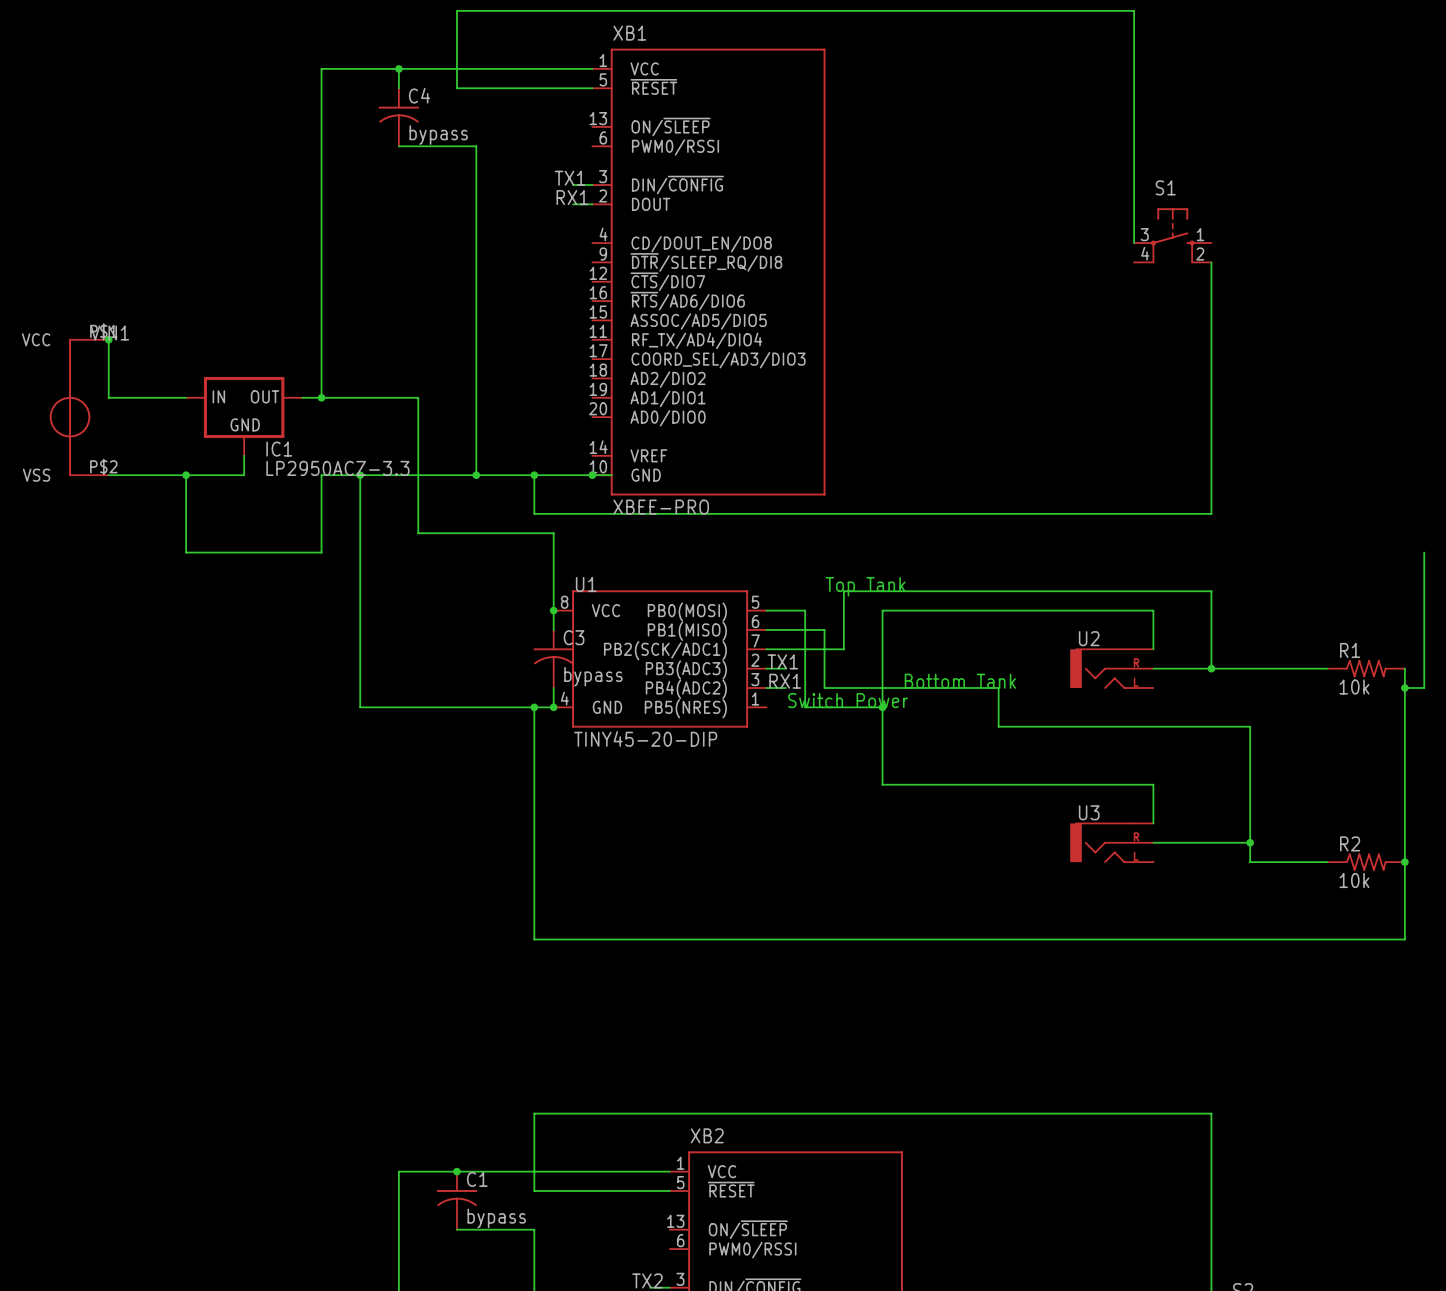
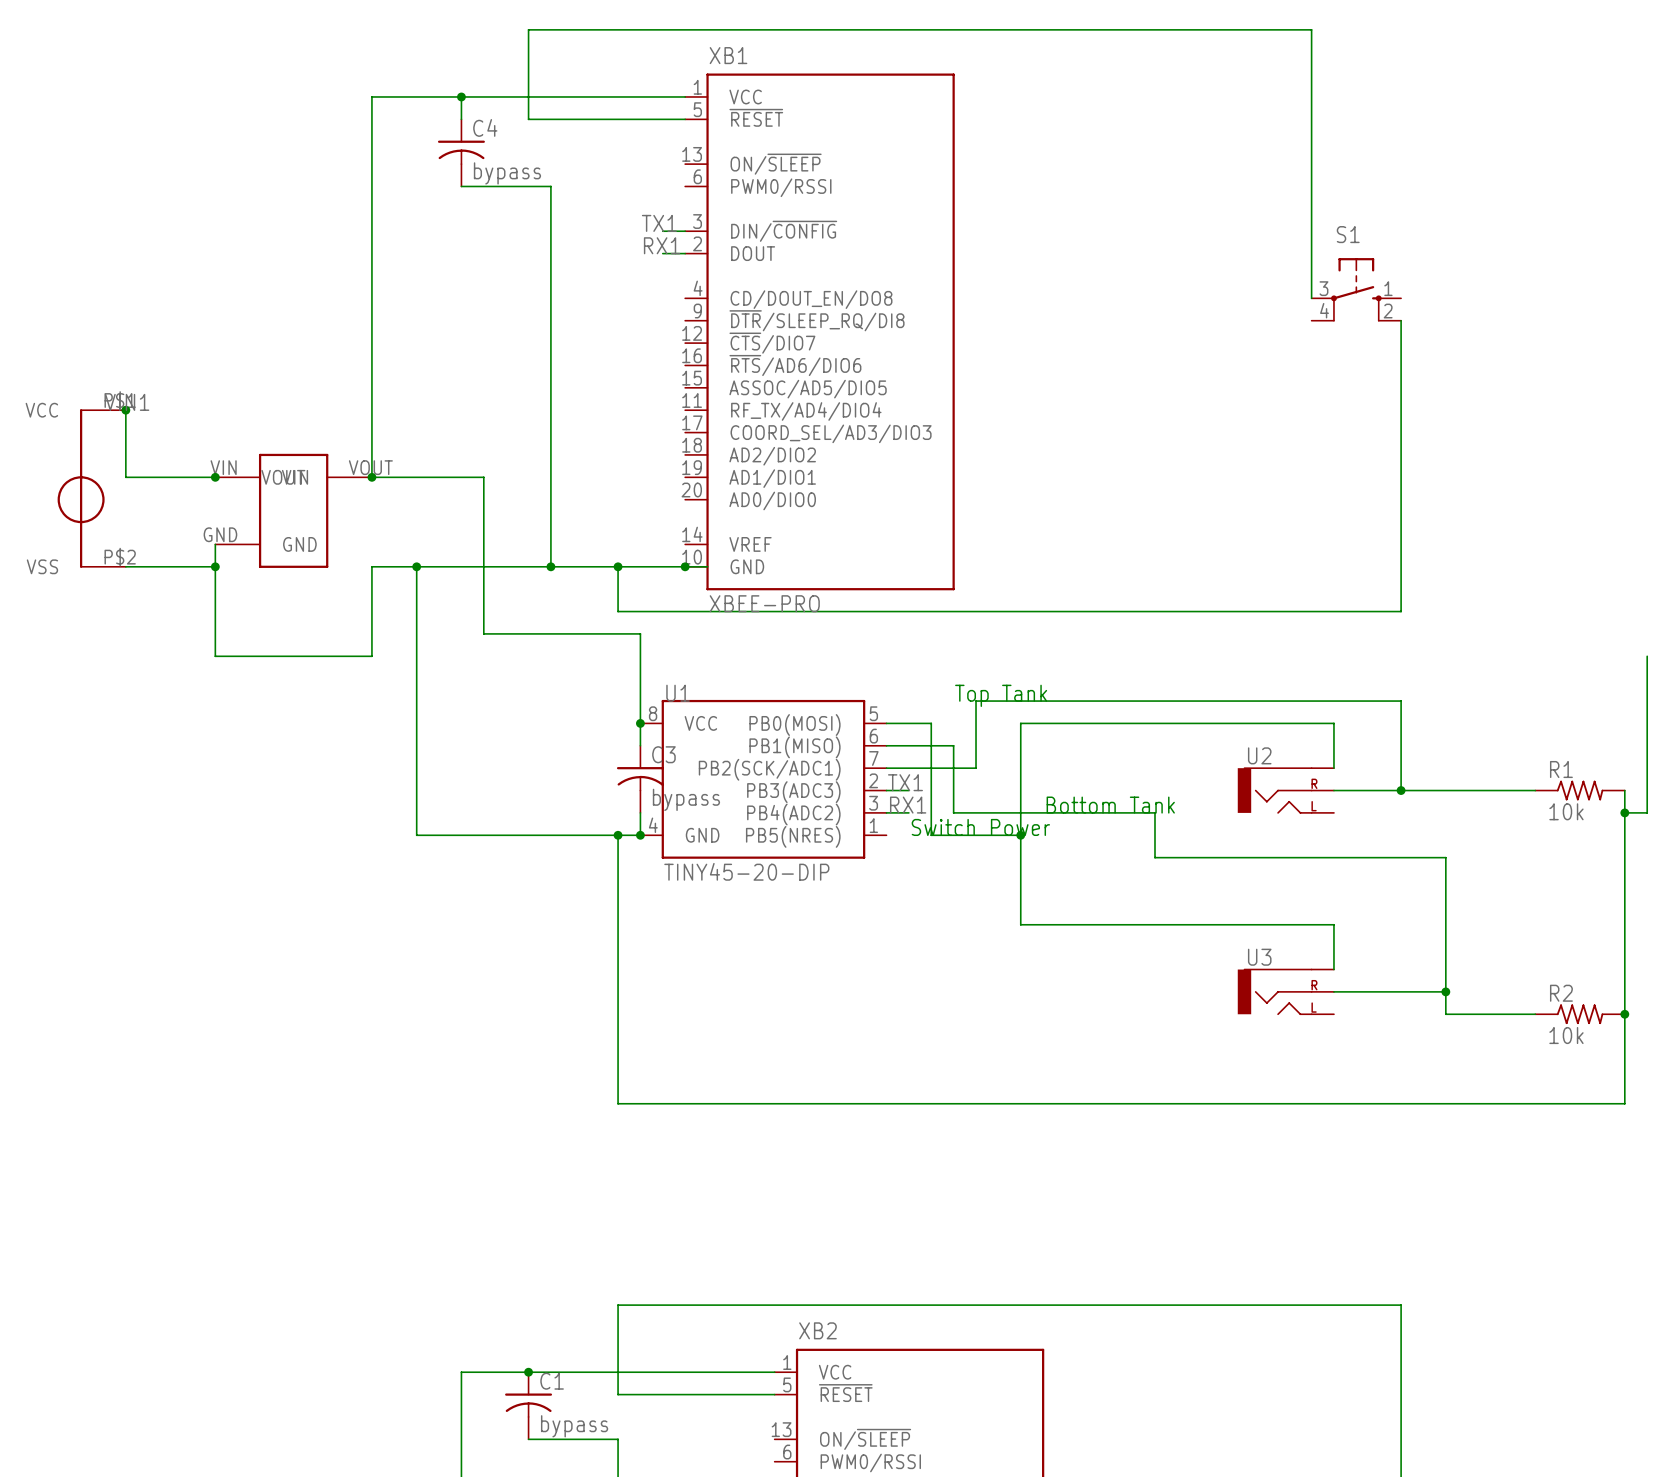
junction: none -> (215, 477)
IC1: LP2950ACZ-3.3 (244, 416) -> none
part: none -> (293, 510)
wire: (244, 455) (244, 475) (186, 475) -> (215, 544) (215, 566)

